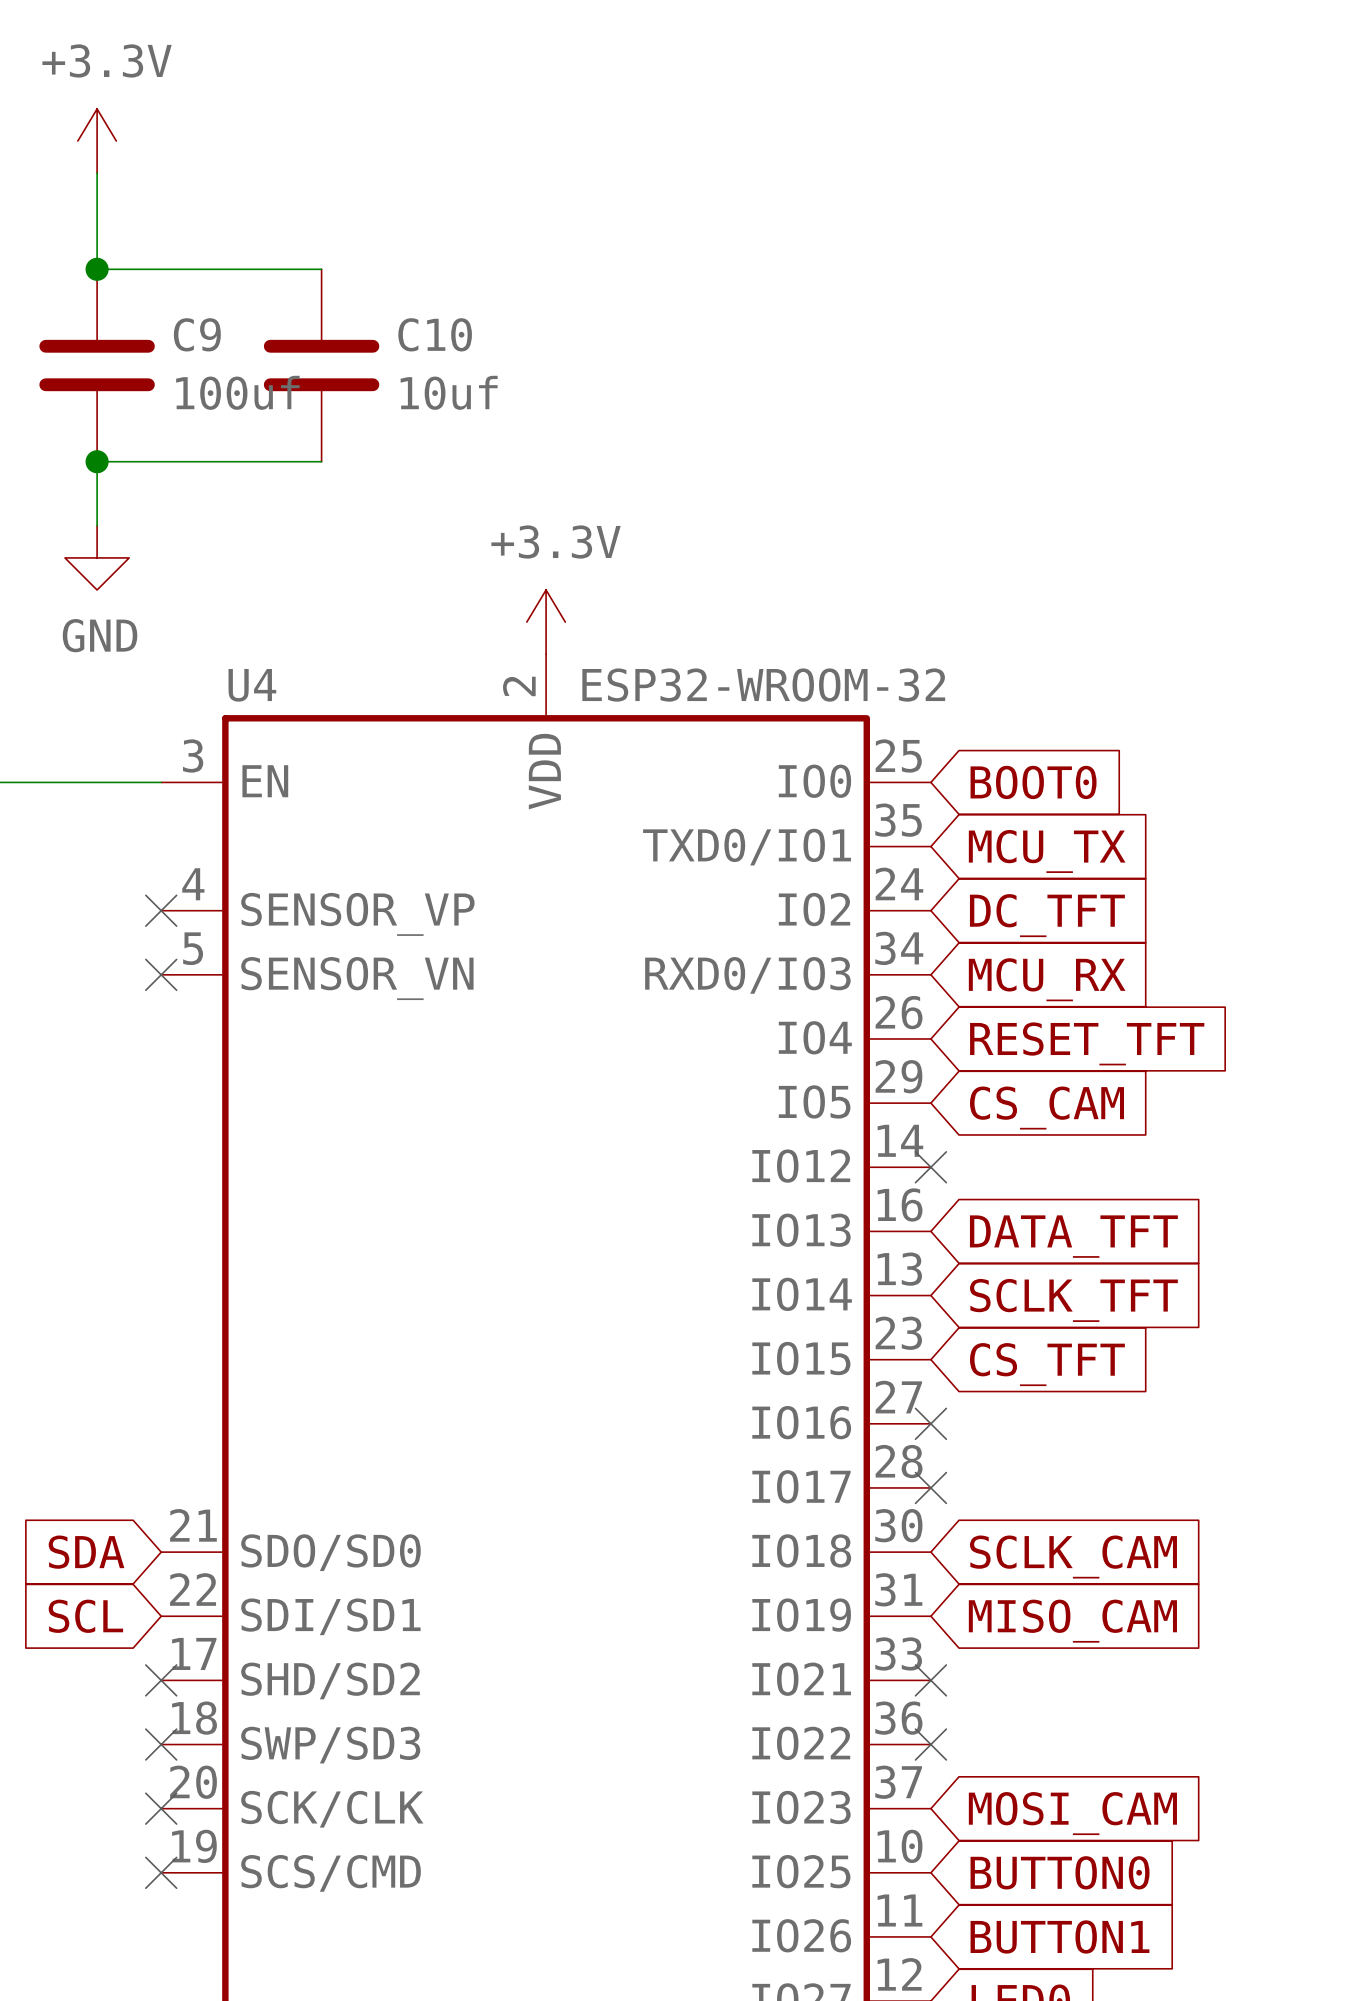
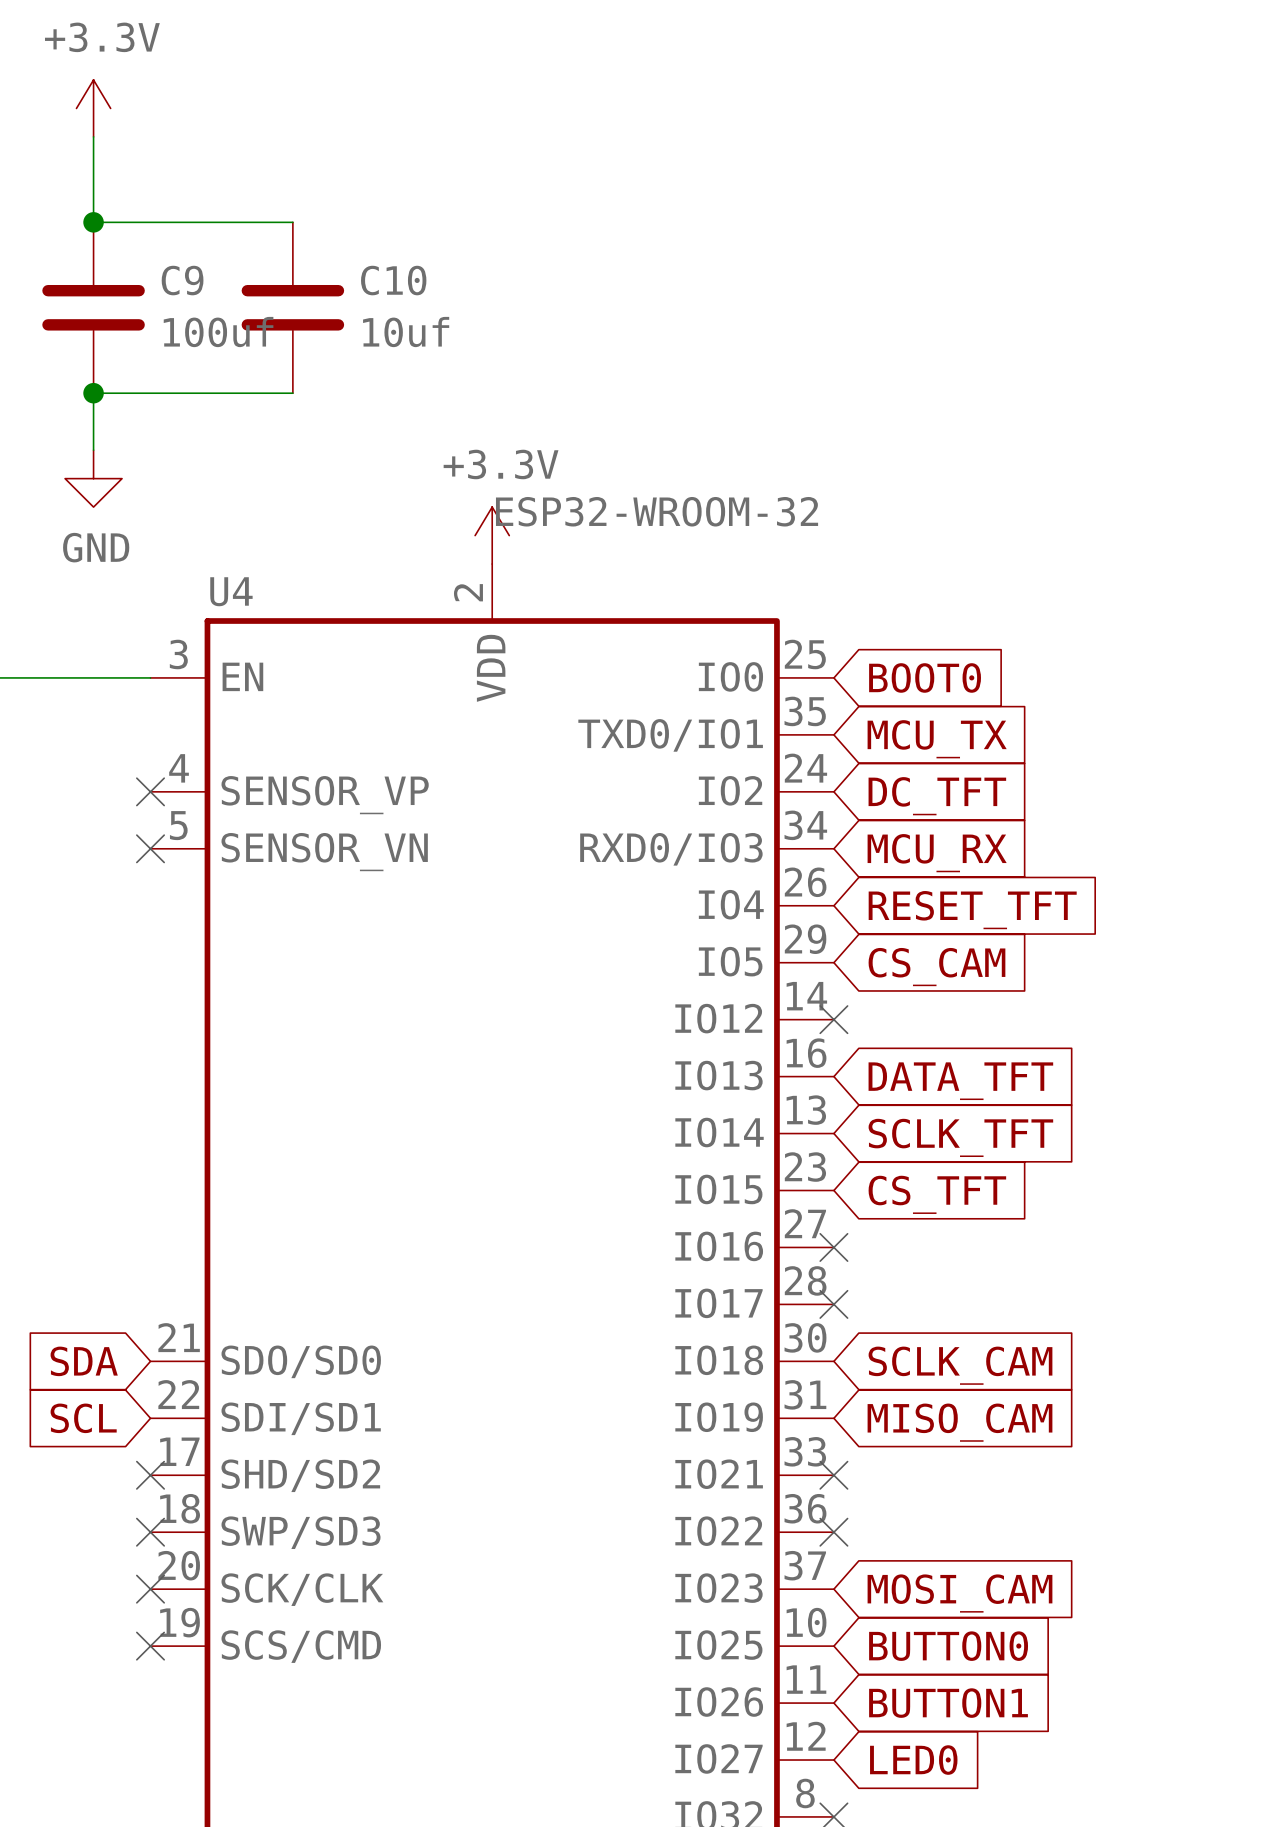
U4 value position: ESP32-WROOM-32 (763, 685) -> ESP32-WROOM-32 (657, 511)

